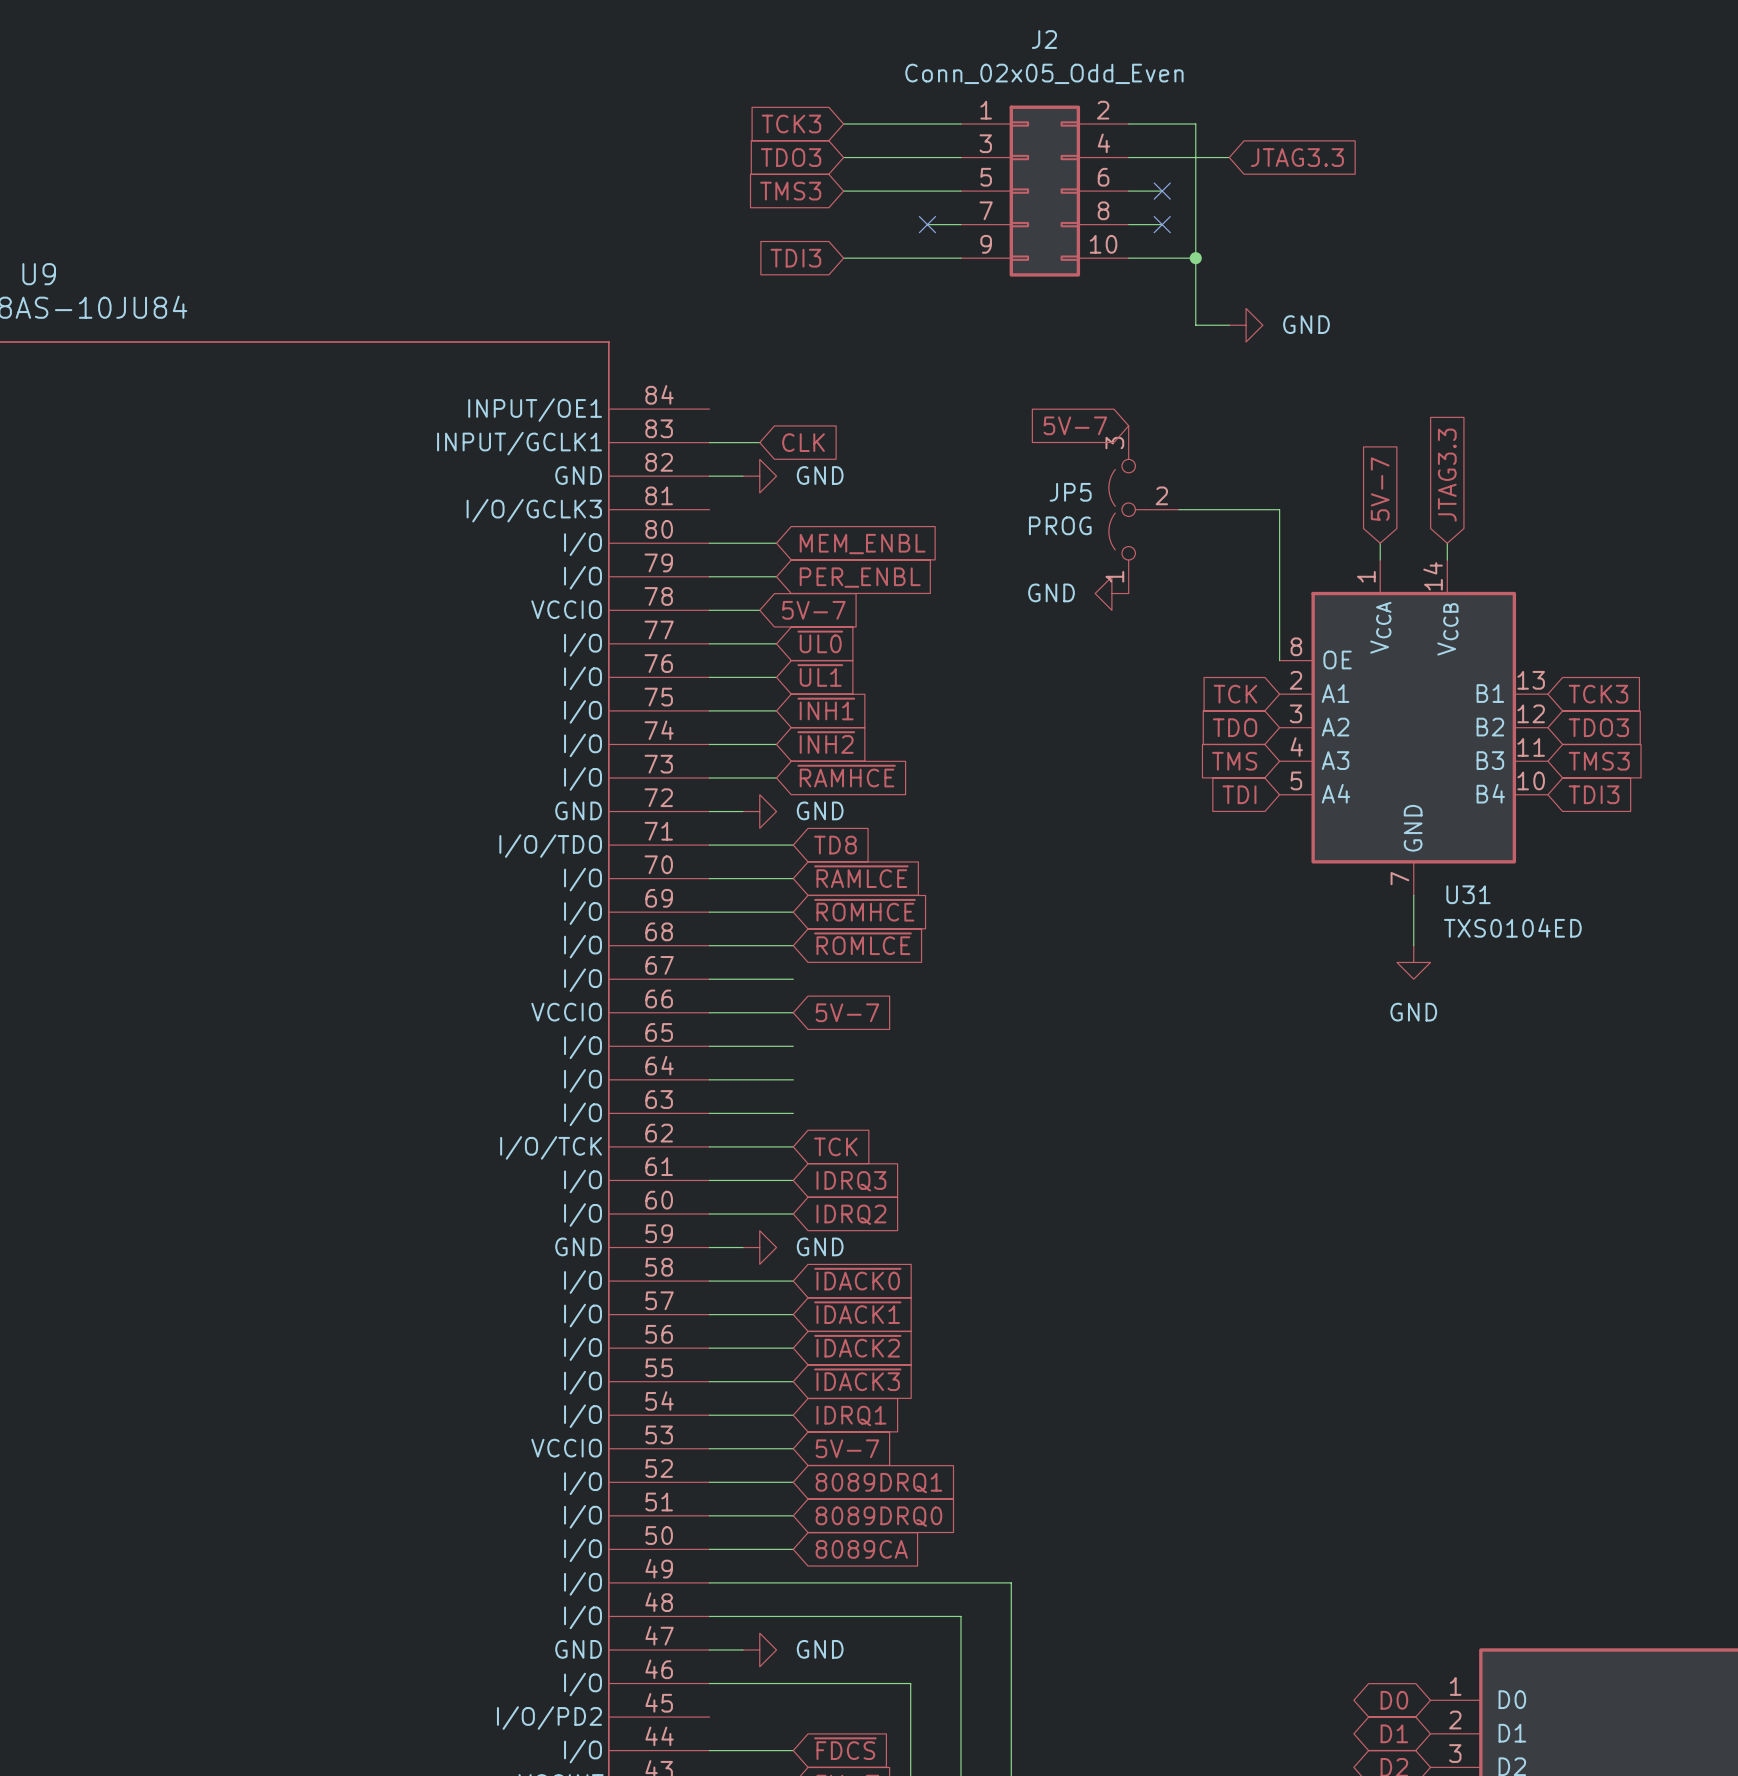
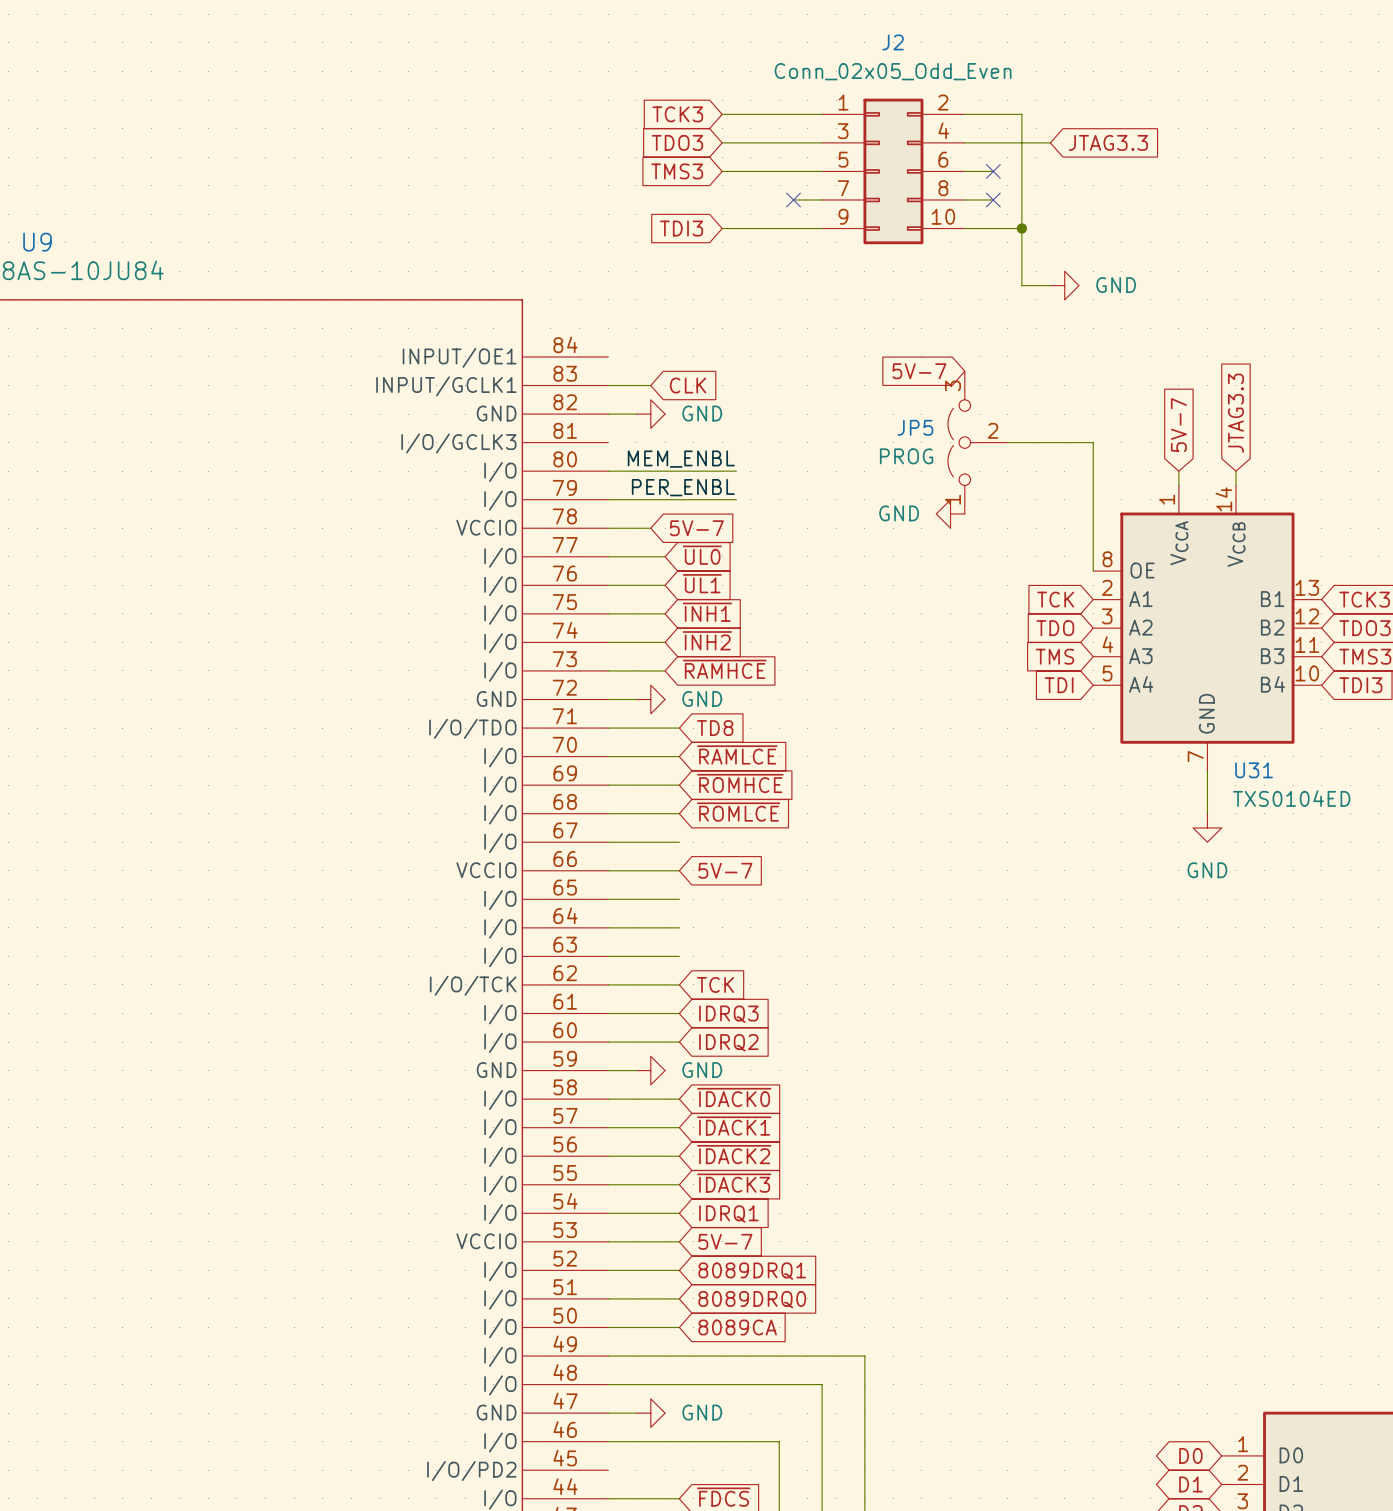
label: none -> MEM_ENBL (681, 459)
wire: none -> (665, 471) (736, 471)
global label: MEM_ENBL (862, 544) -> none
label: none -> PER_ENBL (683, 487)
wire: none -> (665, 499) (736, 499)
global label: PER_ENBL (860, 577) -> none

